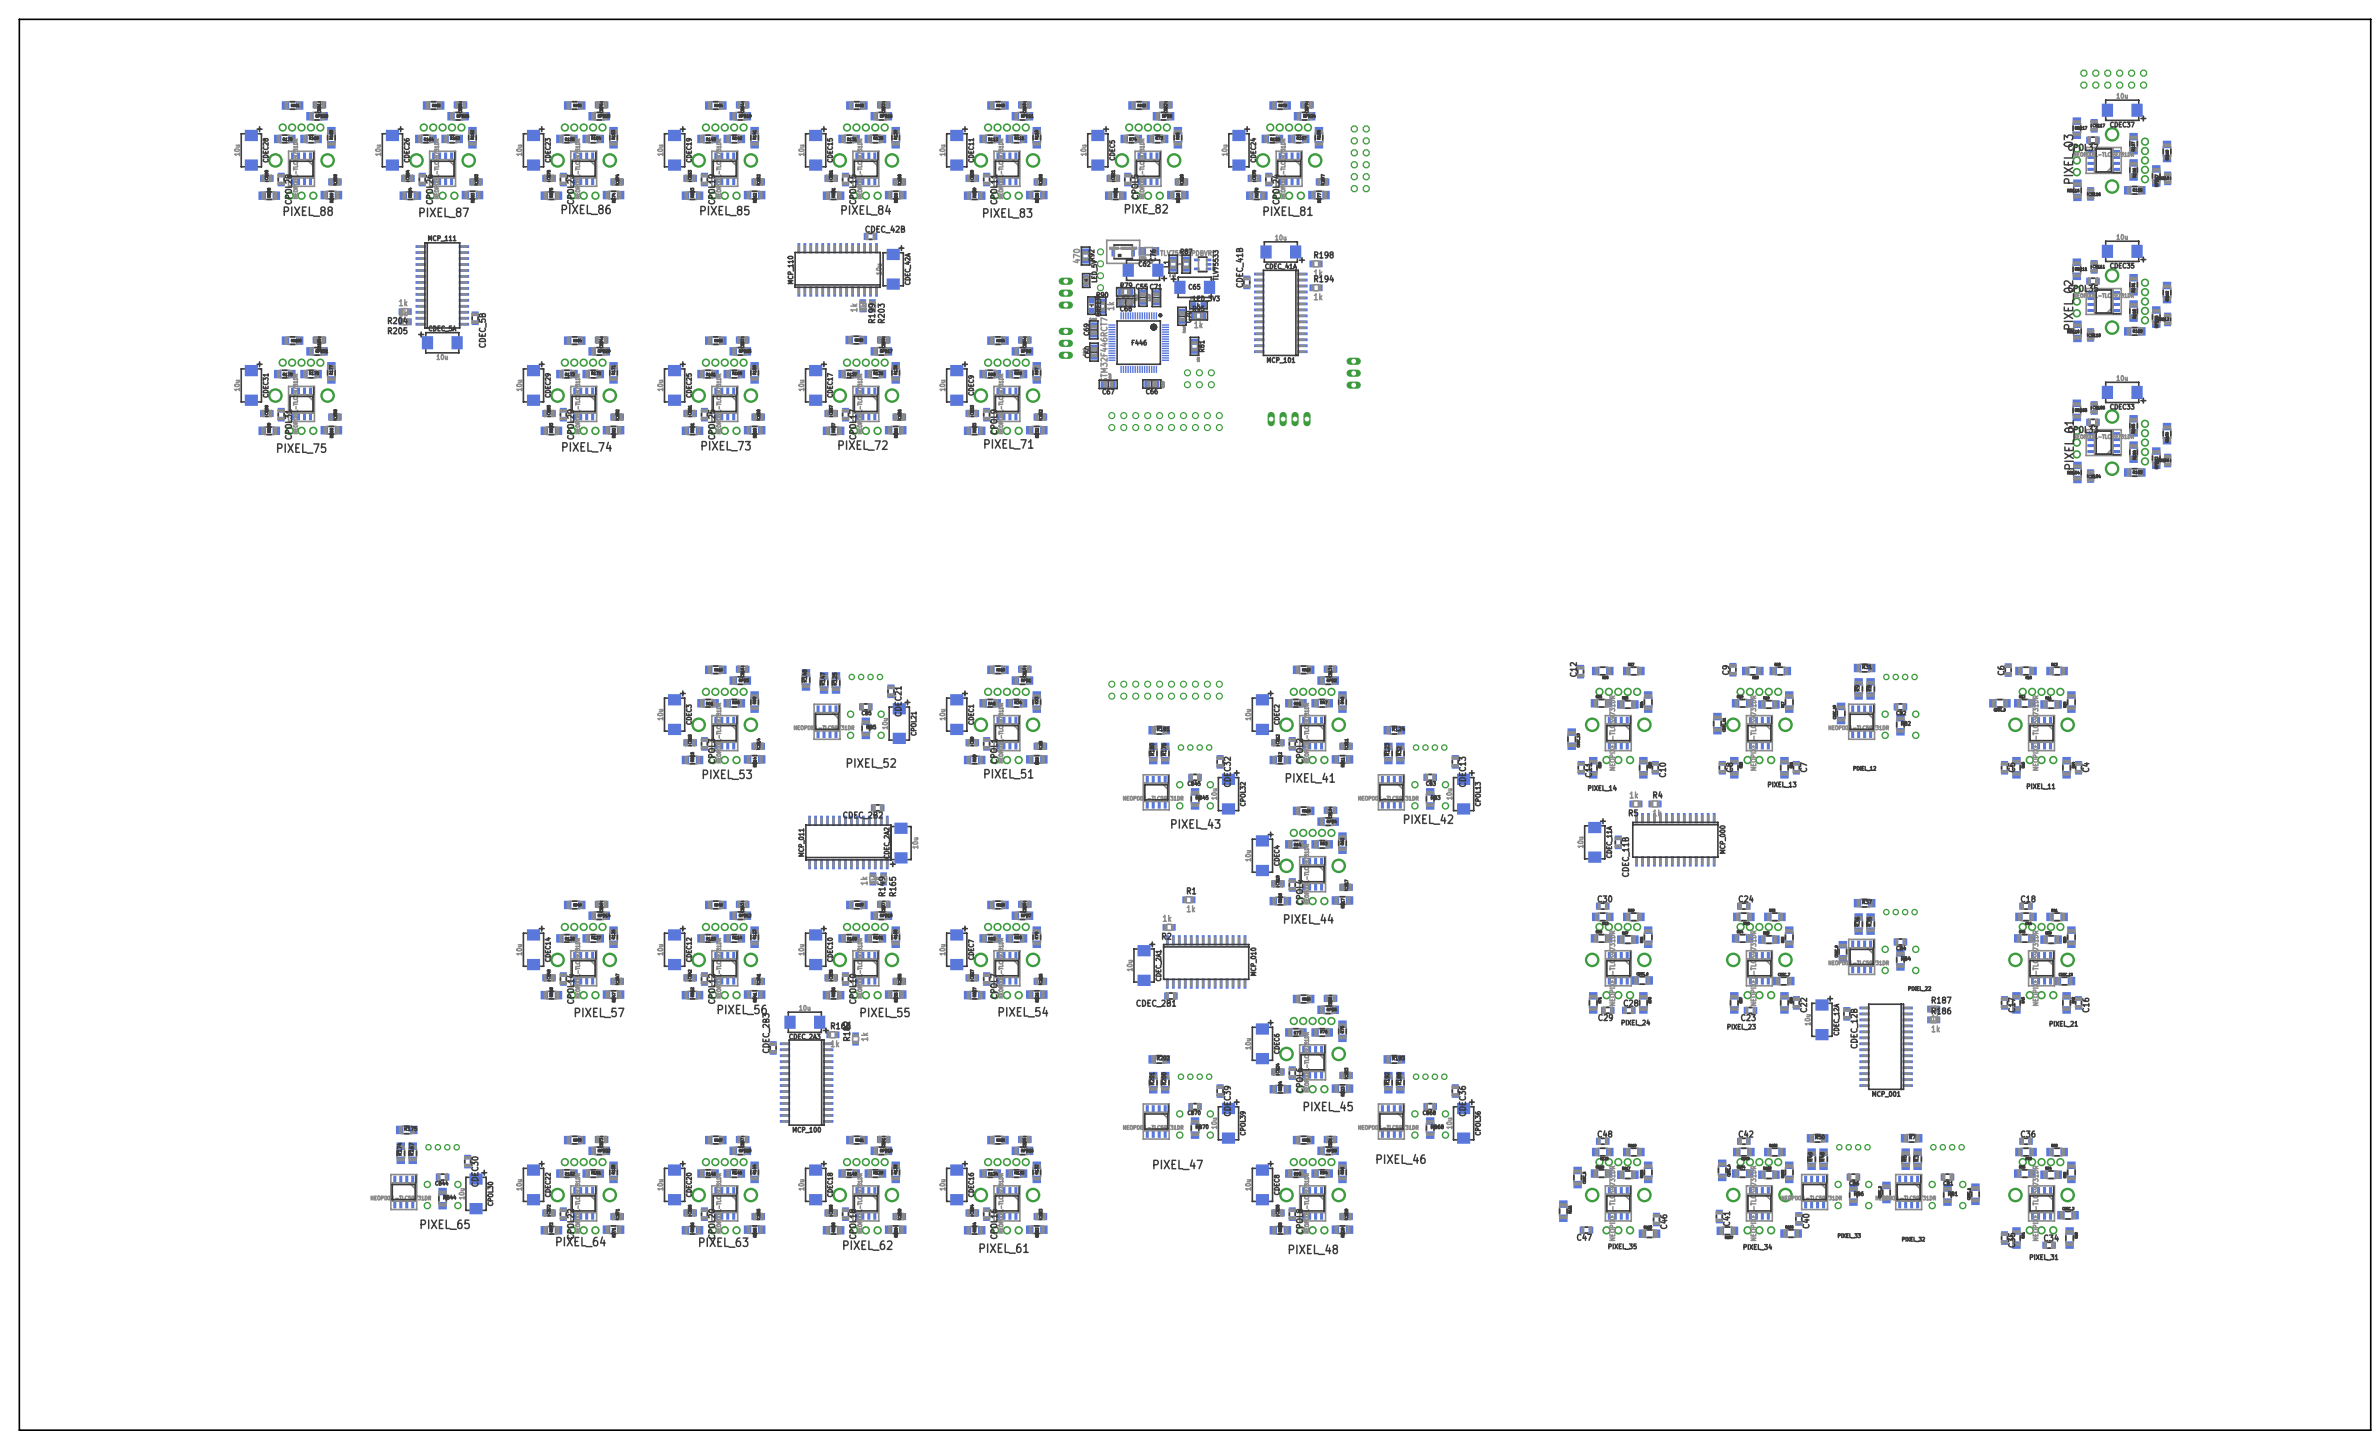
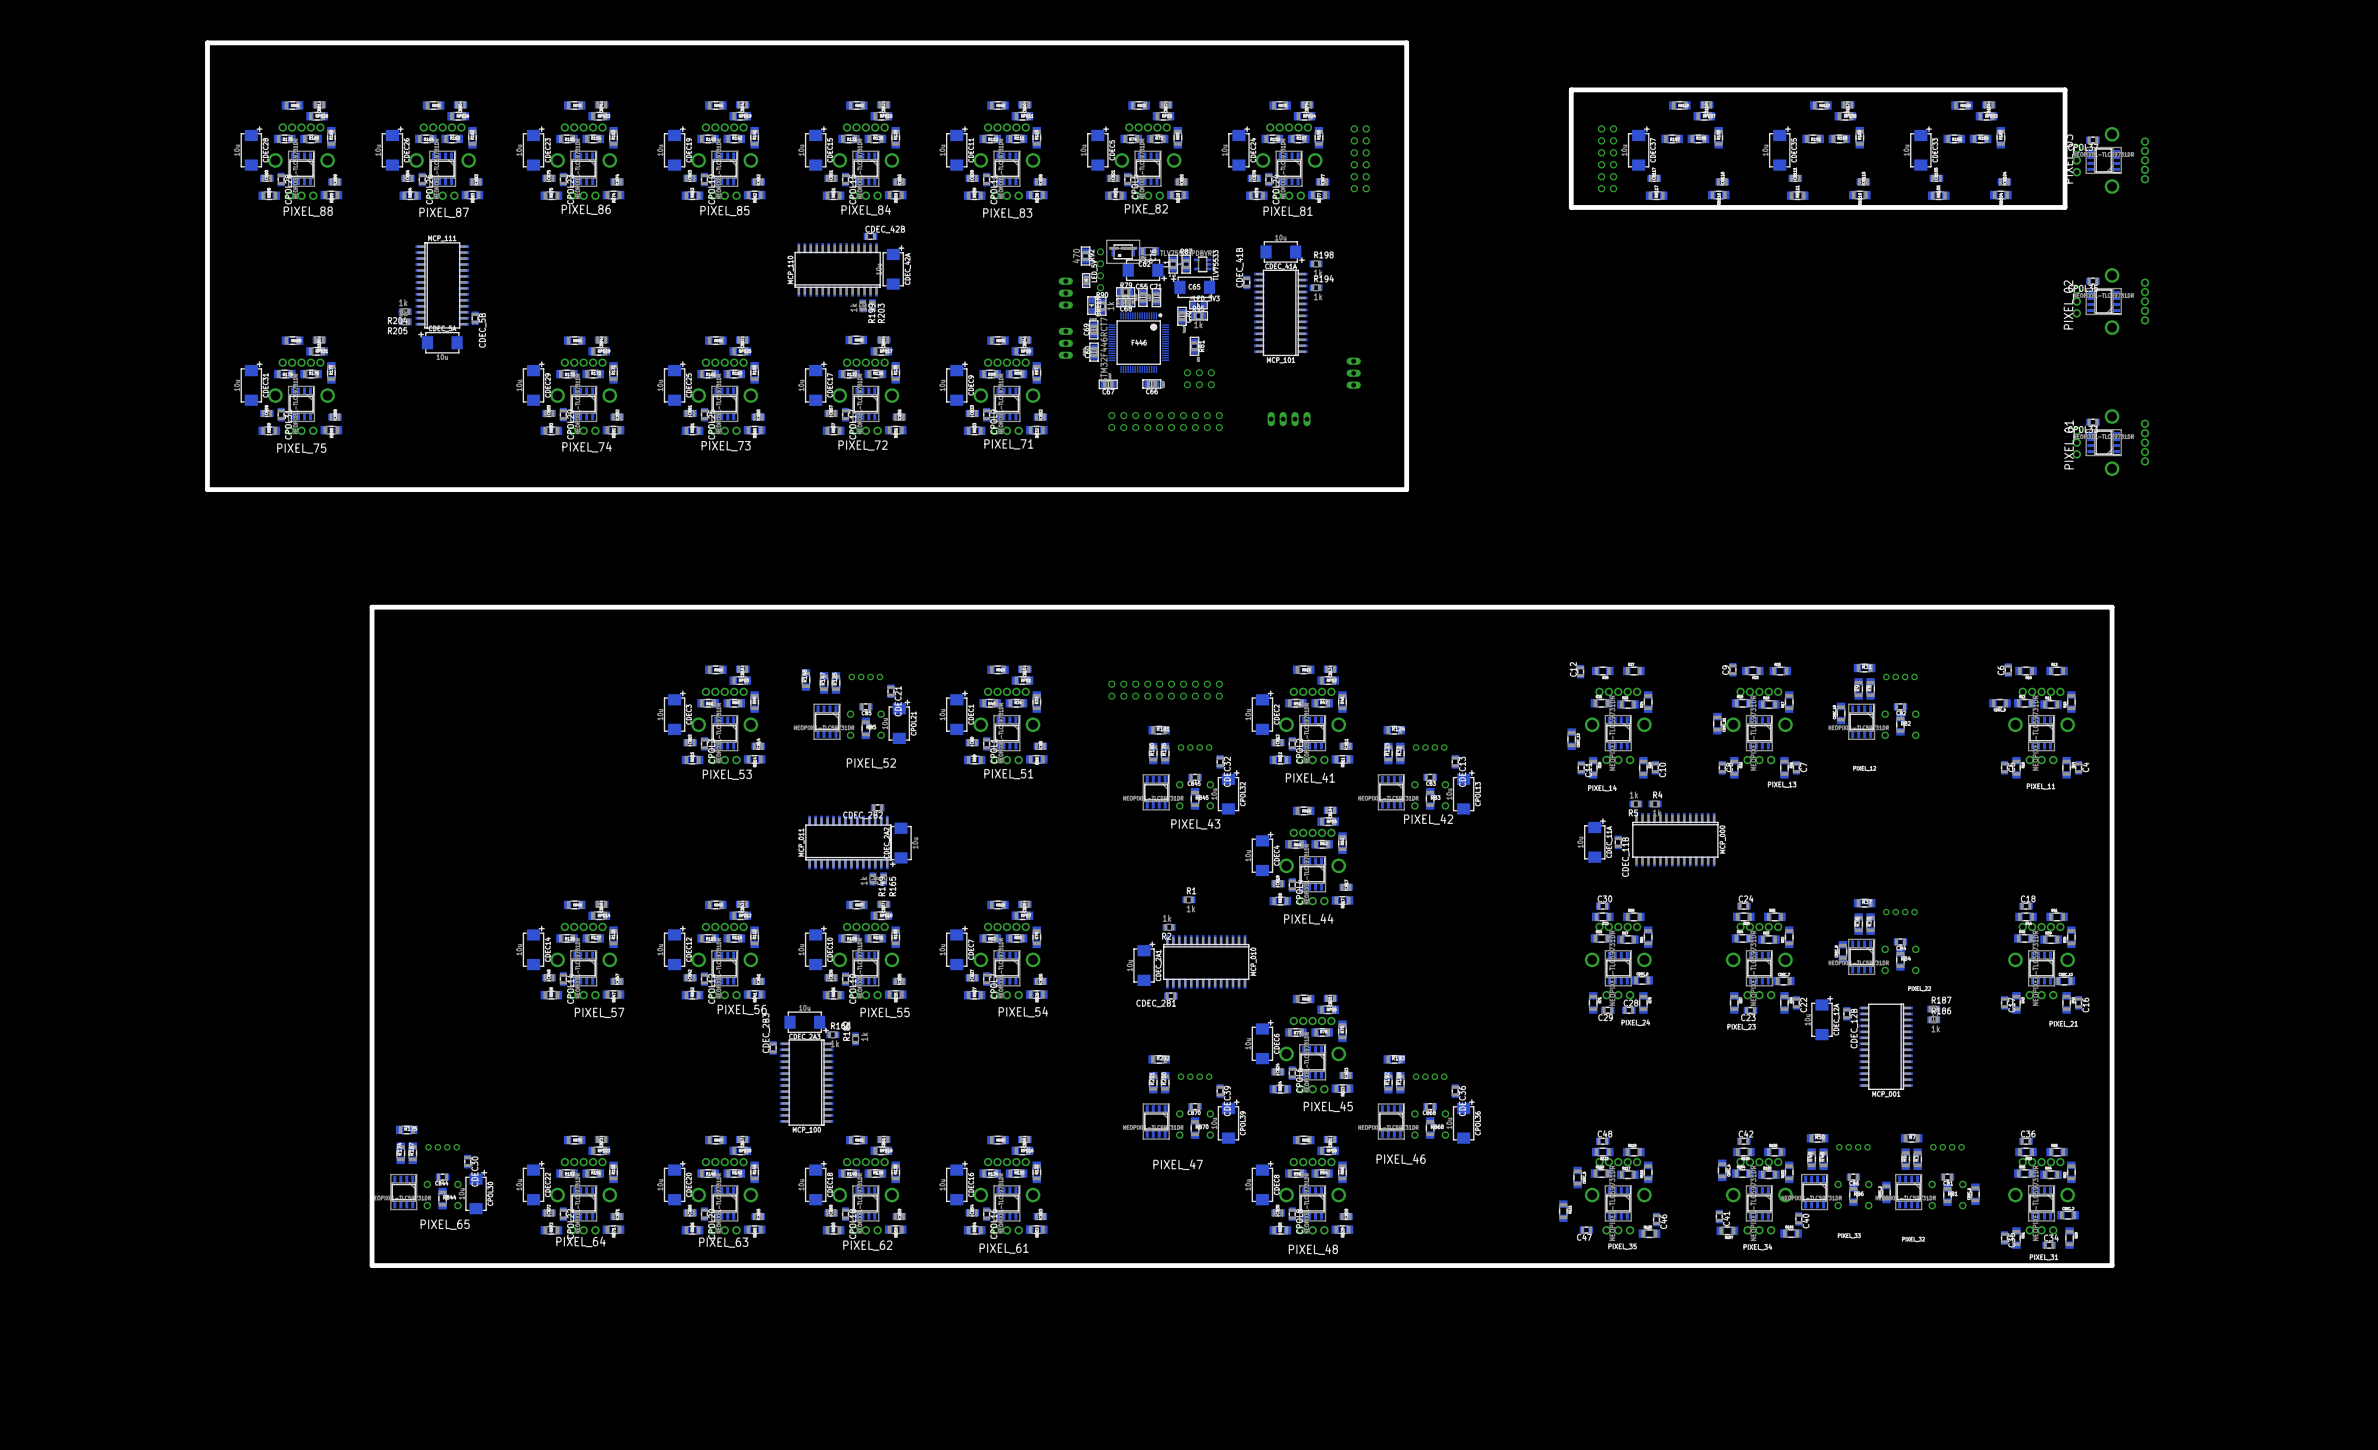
board edge: (2370, 19) (19, 19) (19, 1430) (2370, 1430) (2370, 19) -> none
board edge: none -> (1406, 42) (1406, 489) (207, 489) (207, 42) (1406, 42)
part: (2113, 79) -> none
board edge: none -> (2065, 89) (1571, 89) (1571, 207) (2065, 207) (2065, 89)
part rotation: 0° (2123, 110) -> 90° counterclockwise (1638, 148)
part position: (2123, 110) -> (1638, 148)
part rotation: 0° (2094, 125) -> 90° clockwise (1654, 178)
part position: (2094, 125) -> (1654, 178)
part rotation: 0° (2076, 128) -> 90° clockwise (1656, 195)
part position: (2076, 128) -> (1656, 195)
part rotation: 0° (2133, 143) -> 90° clockwise (1672, 138)
part position: (2133, 143) -> (1672, 138)
part rotation: 0° (2167, 151) -> 90° clockwise (1679, 105)
part position: (2167, 151) -> (1679, 105)
part: none -> (1607, 158)
part rotation: 0° (2133, 169) -> 90° clockwise (1698, 138)
part position: (2133, 169) -> (1698, 138)
part rotation: 0° (2156, 175) -> 90° clockwise (1704, 116)
part position: (2156, 175) -> (1704, 116)
part rotation: 0° (2167, 178) -> 90° clockwise (1706, 104)
part position: (2167, 178) -> (1706, 104)
part rotation: 0° (2077, 190) -> 90° clockwise (1718, 195)
part position: (2077, 190) -> (1718, 195)
part rotation: 0° (2134, 190) -> 90° clockwise (1718, 137)
part position: (2134, 190) -> (1718, 137)
part rotation: 0° (2090, 193) -> 90° clockwise (1722, 181)
part position: (2090, 193) -> (1722, 181)
part rotation: 0° (2123, 251) -> 90° counterclockwise (1780, 148)
part position: (2123, 251) -> (1780, 148)
part rotation: 0° (2094, 266) -> 90° clockwise (1795, 178)
part position: (2094, 266) -> (1795, 178)
part rotation: 0° (2076, 269) -> 90° clockwise (1797, 195)
part position: (2076, 269) -> (1797, 195)
part rotation: 0° (2133, 284) -> 90° clockwise (1813, 138)
part position: (2133, 284) -> (1813, 138)
part rotation: 0° (2167, 292) -> 90° clockwise (1820, 105)
part position: (2167, 292) -> (1820, 105)
part rotation: 0° (2133, 311) -> 90° clockwise (1839, 138)
part position: (2133, 311) -> (1839, 138)
part rotation: 0° (2156, 317) -> 90° clockwise (1845, 116)
part position: (2156, 317) -> (1845, 116)
part rotation: 0° (2167, 319) -> 90° clockwise (1847, 104)
part position: (2167, 319) -> (1847, 104)
part rotation: 0° (2077, 331) -> 90° clockwise (1859, 195)
part position: (2077, 331) -> (1859, 195)
part rotation: 0° (2134, 331) -> 90° clockwise (1859, 137)
part position: (2134, 331) -> (1859, 137)
part rotation: 0° (2090, 334) -> 90° clockwise (1863, 181)
part position: (2090, 334) -> (1863, 181)
part rotation: 0° (2123, 392) -> 90° counterclockwise (1921, 148)
part position: (2123, 392) -> (1921, 148)
part rotation: 0° (2094, 407) -> 90° clockwise (1936, 178)
part position: (2094, 407) -> (1936, 178)
part rotation: 0° (2076, 410) -> 90° clockwise (1938, 195)
part position: (2076, 410) -> (1938, 195)
part rotation: 0° (2133, 425) -> 90° clockwise (1954, 138)
part position: (2133, 425) -> (1954, 138)
part rotation: 0° (2167, 433) -> 90° clockwise (1962, 105)
part position: (2167, 433) -> (1962, 105)
part rotation: 0° (2133, 452) -> 90° clockwise (1980, 138)
part position: (2133, 452) -> (1980, 138)
part rotation: 0° (2156, 458) -> 90° clockwise (1986, 116)
part position: (2156, 458) -> (1986, 116)
part rotation: 0° (2167, 460) -> 90° clockwise (1988, 104)
part position: (2167, 460) -> (1988, 104)
part rotation: 0° (2077, 472) -> 90° clockwise (2000, 195)
part position: (2077, 472) -> (2000, 195)
part rotation: 0° (2134, 472) -> 90° clockwise (2000, 137)
part position: (2134, 472) -> (2000, 137)
part rotation: 0° (2090, 476) -> 90° clockwise (2004, 181)
part position: (2090, 476) -> (2004, 181)
board edge: none -> (2112, 607) (372, 607) (372, 1265) (2112, 1265) (2112, 607)

